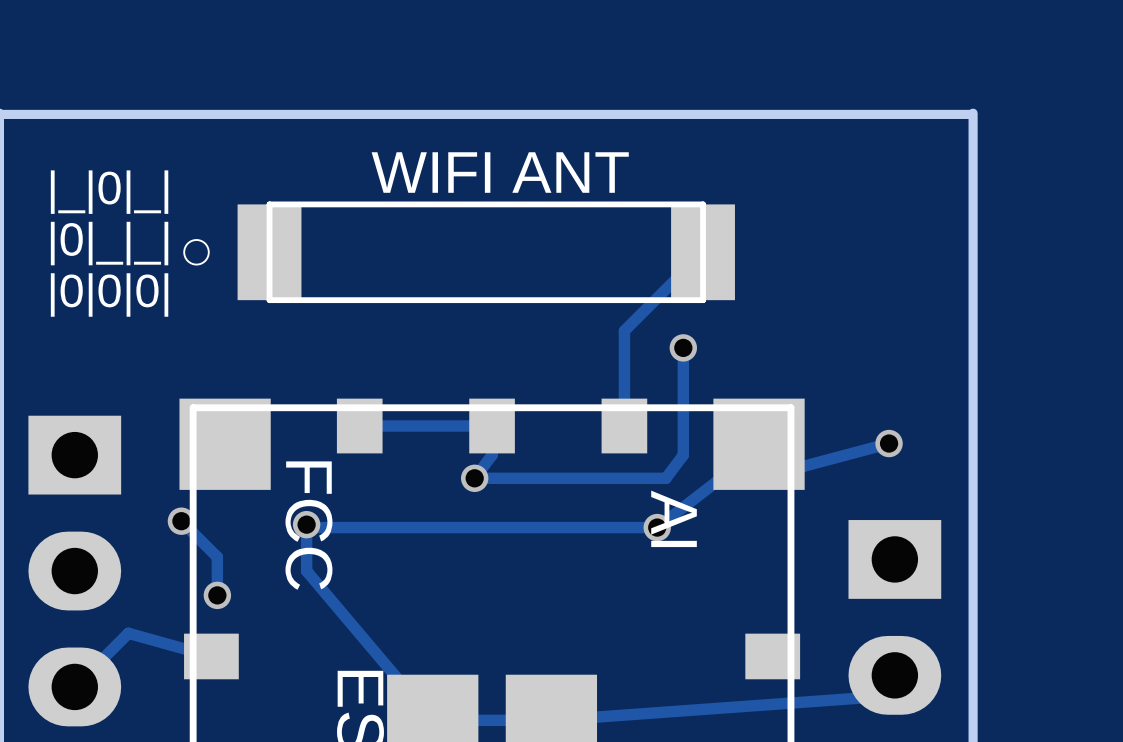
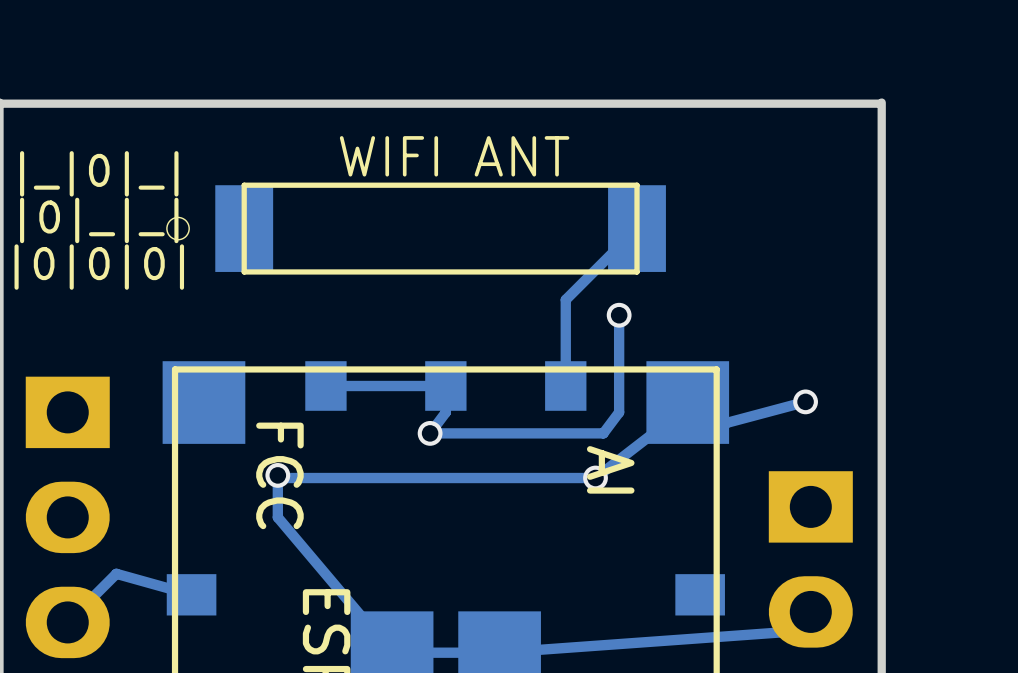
track: (181, 521) (217, 557) (217, 595) -> none
via: (181, 521) -> none
via: (217, 595) -> none

